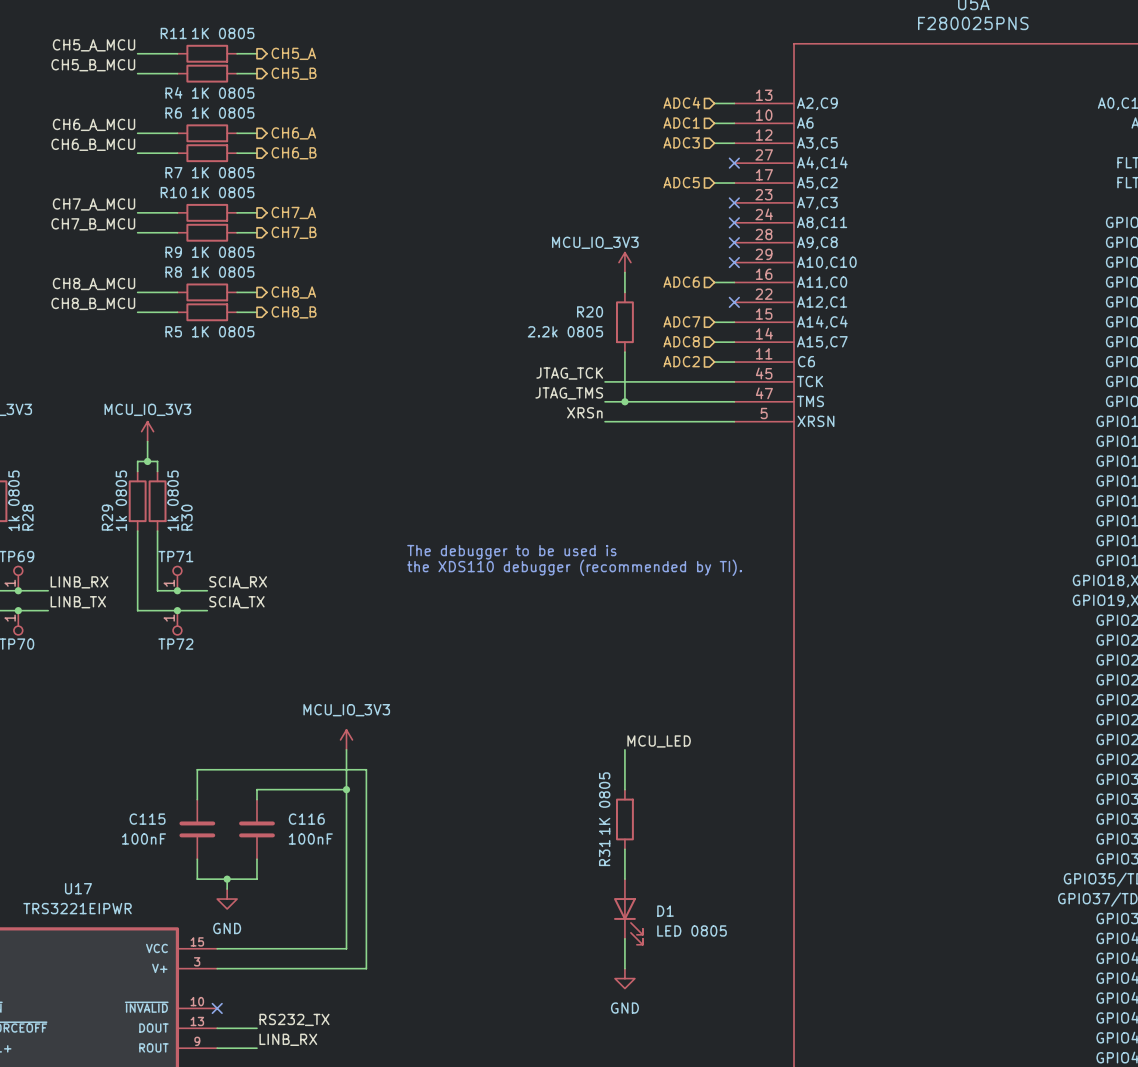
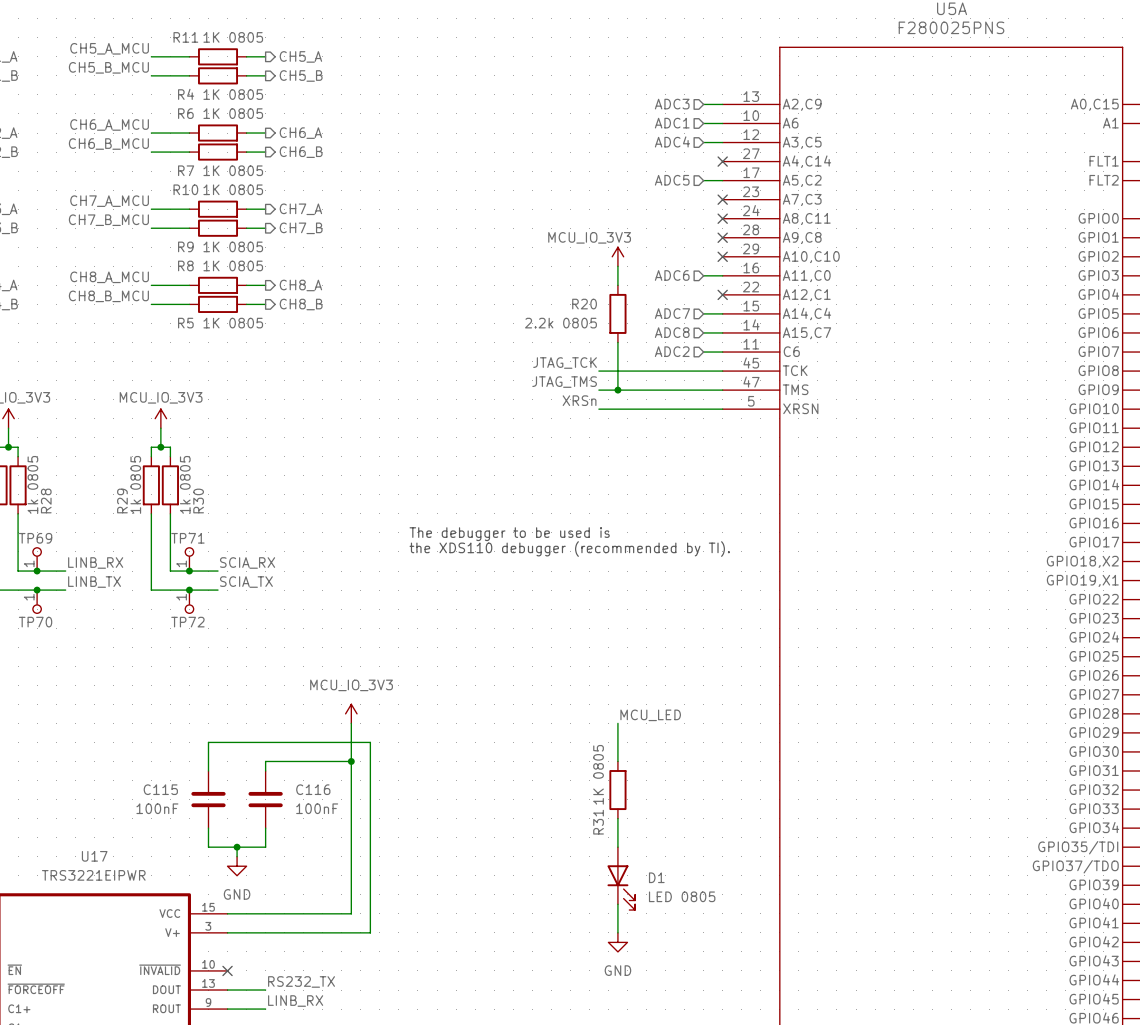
hierarchical label: ADC4 (681, 102) -> ADC3 (672, 104)
hierarchical label: ADC3 (681, 142) -> ADC4 (672, 141)

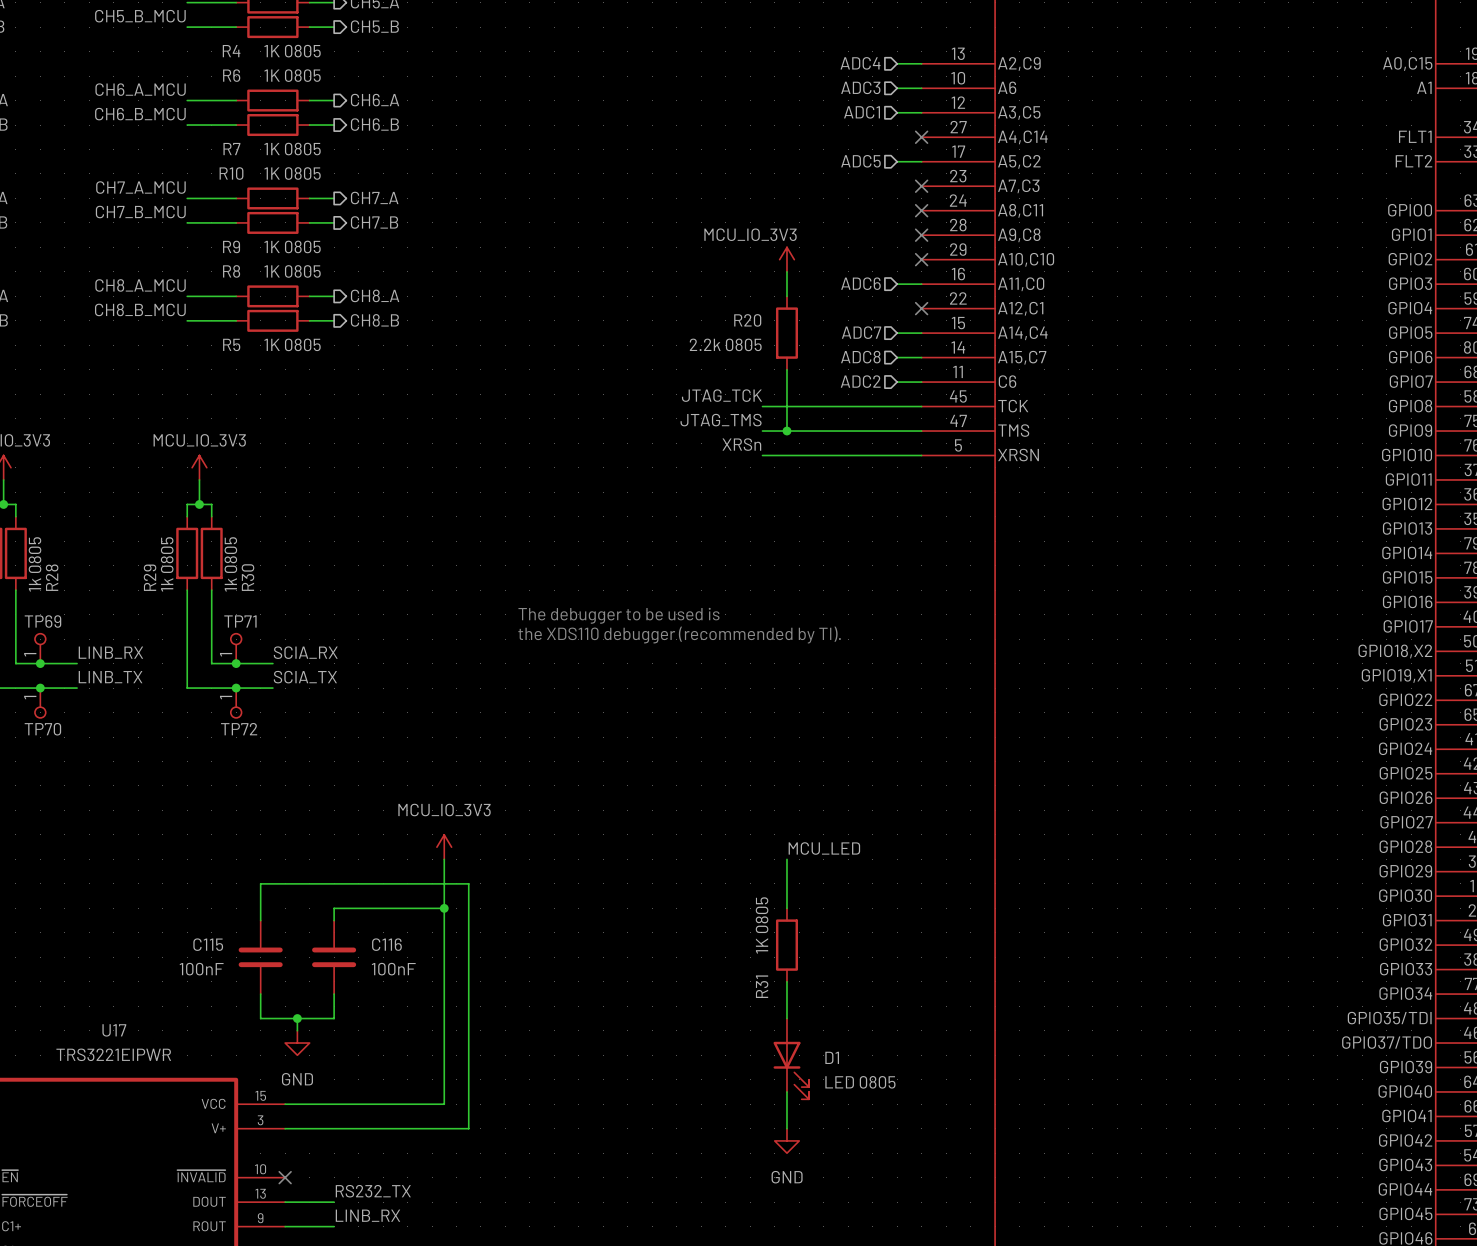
hierarchical label: ADC3 (672, 104) -> ADC4 (860, 63)
hierarchical label: ADC1 (672, 123) -> ADC3 (860, 87)
hierarchical label: ADC4 (672, 141) -> ADC1 (862, 112)

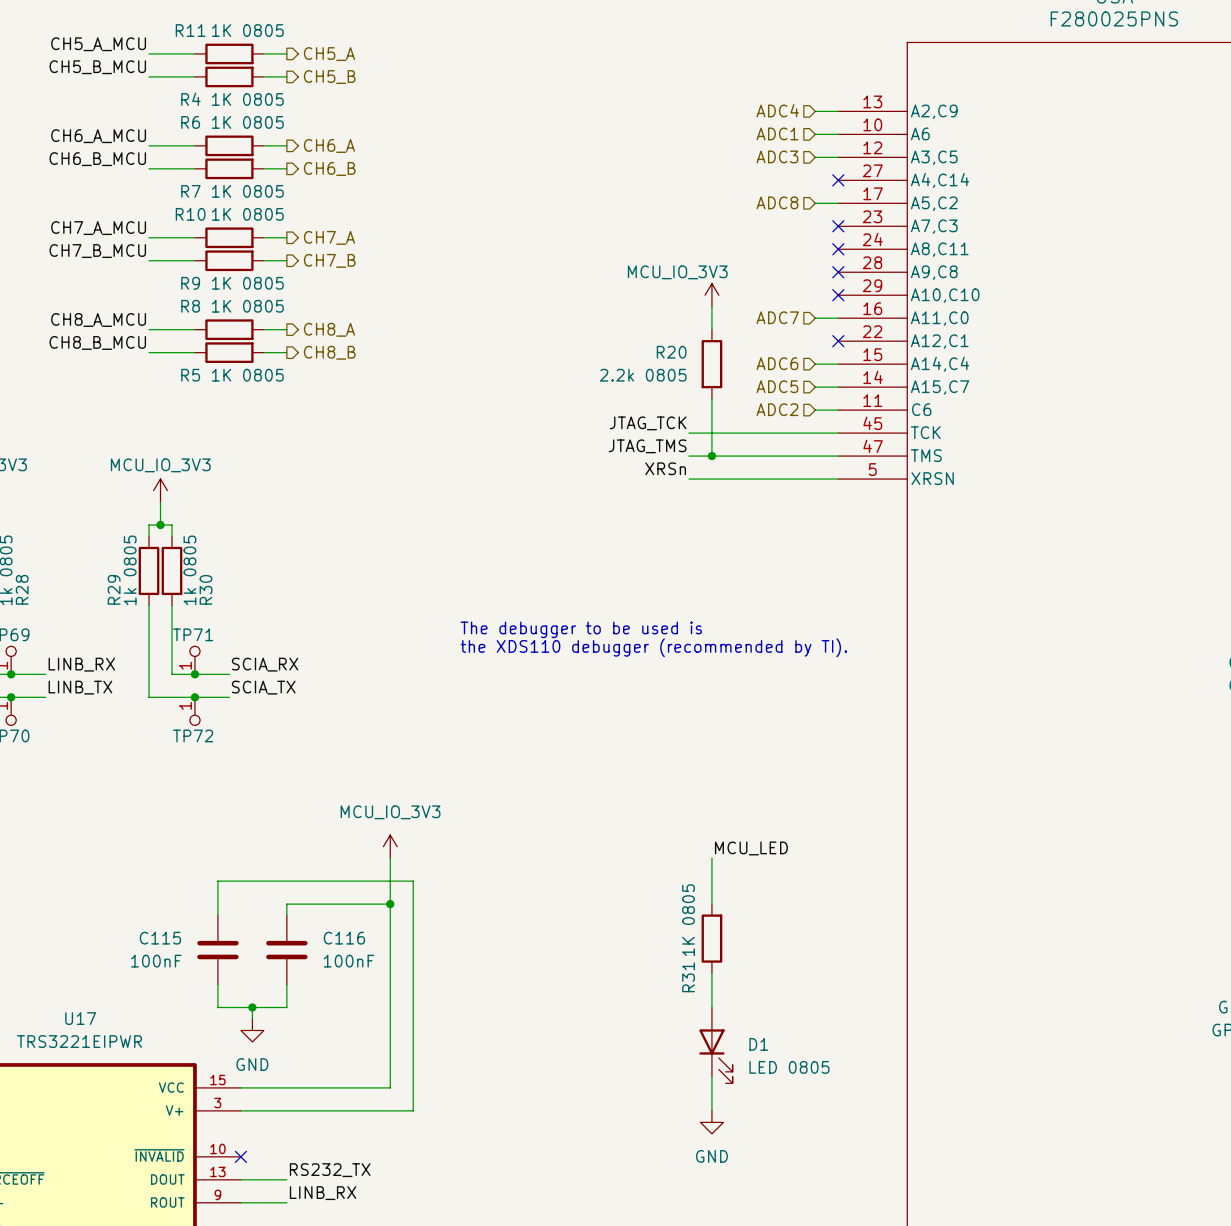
hierarchical label: ADC3 (860, 87) -> ADC1 (777, 133)
hierarchical label: ADC1 (862, 112) -> ADC3 (777, 156)
hierarchical label: ADC5 (860, 161) -> ADC8 (777, 202)
hierarchical label: ADC6 (860, 283) -> ADC7 (777, 317)
hierarchical label: ADC7 (861, 332) -> ADC6 (777, 363)
hierarchical label: ADC8 (860, 357) -> ADC5 (777, 386)

